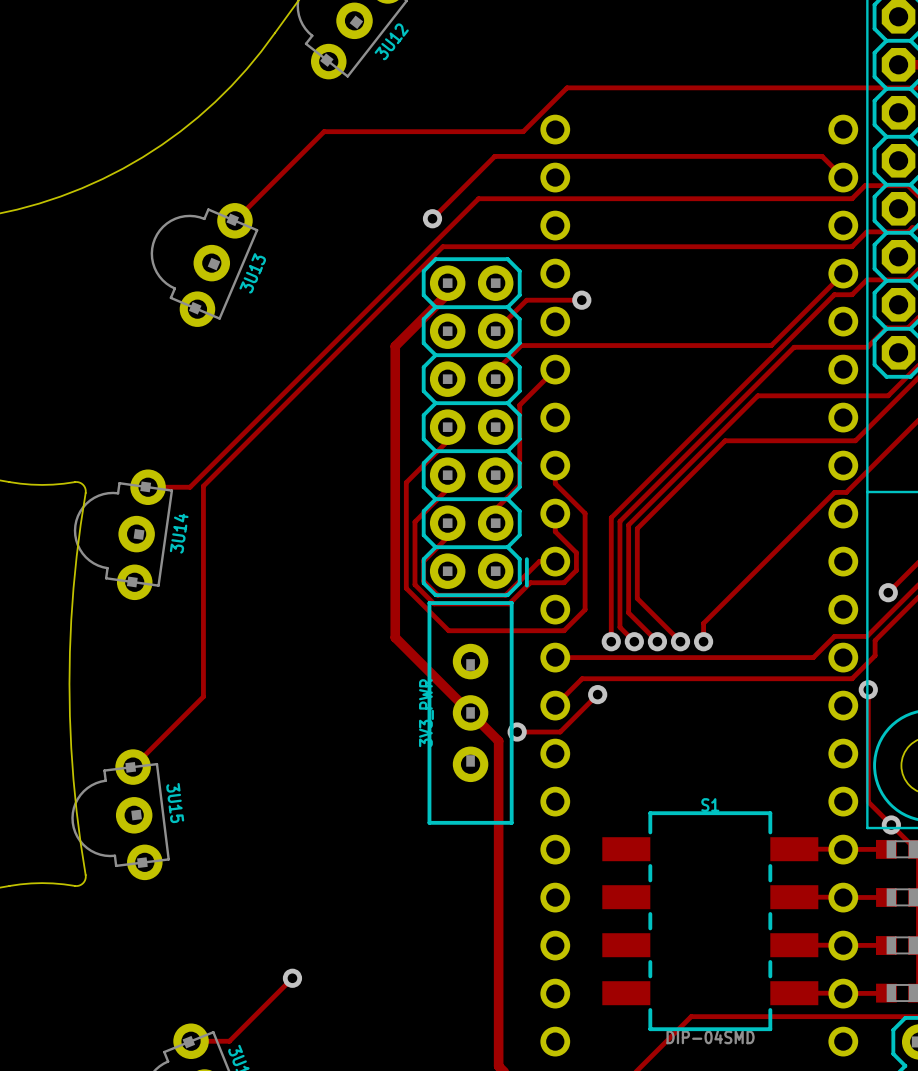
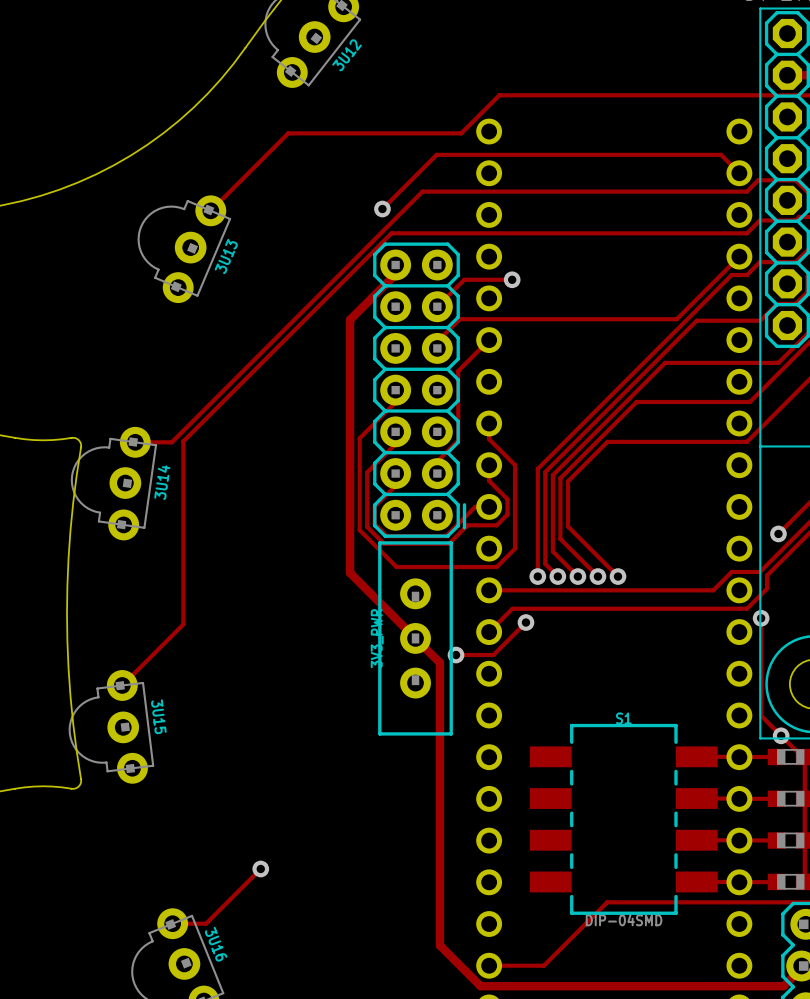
track: (852, 486) (846, 492) (834, 492) (703, 623) (703, 641) -> (747, 441) (607, 441) (567, 481) (567, 526) (618, 576)

